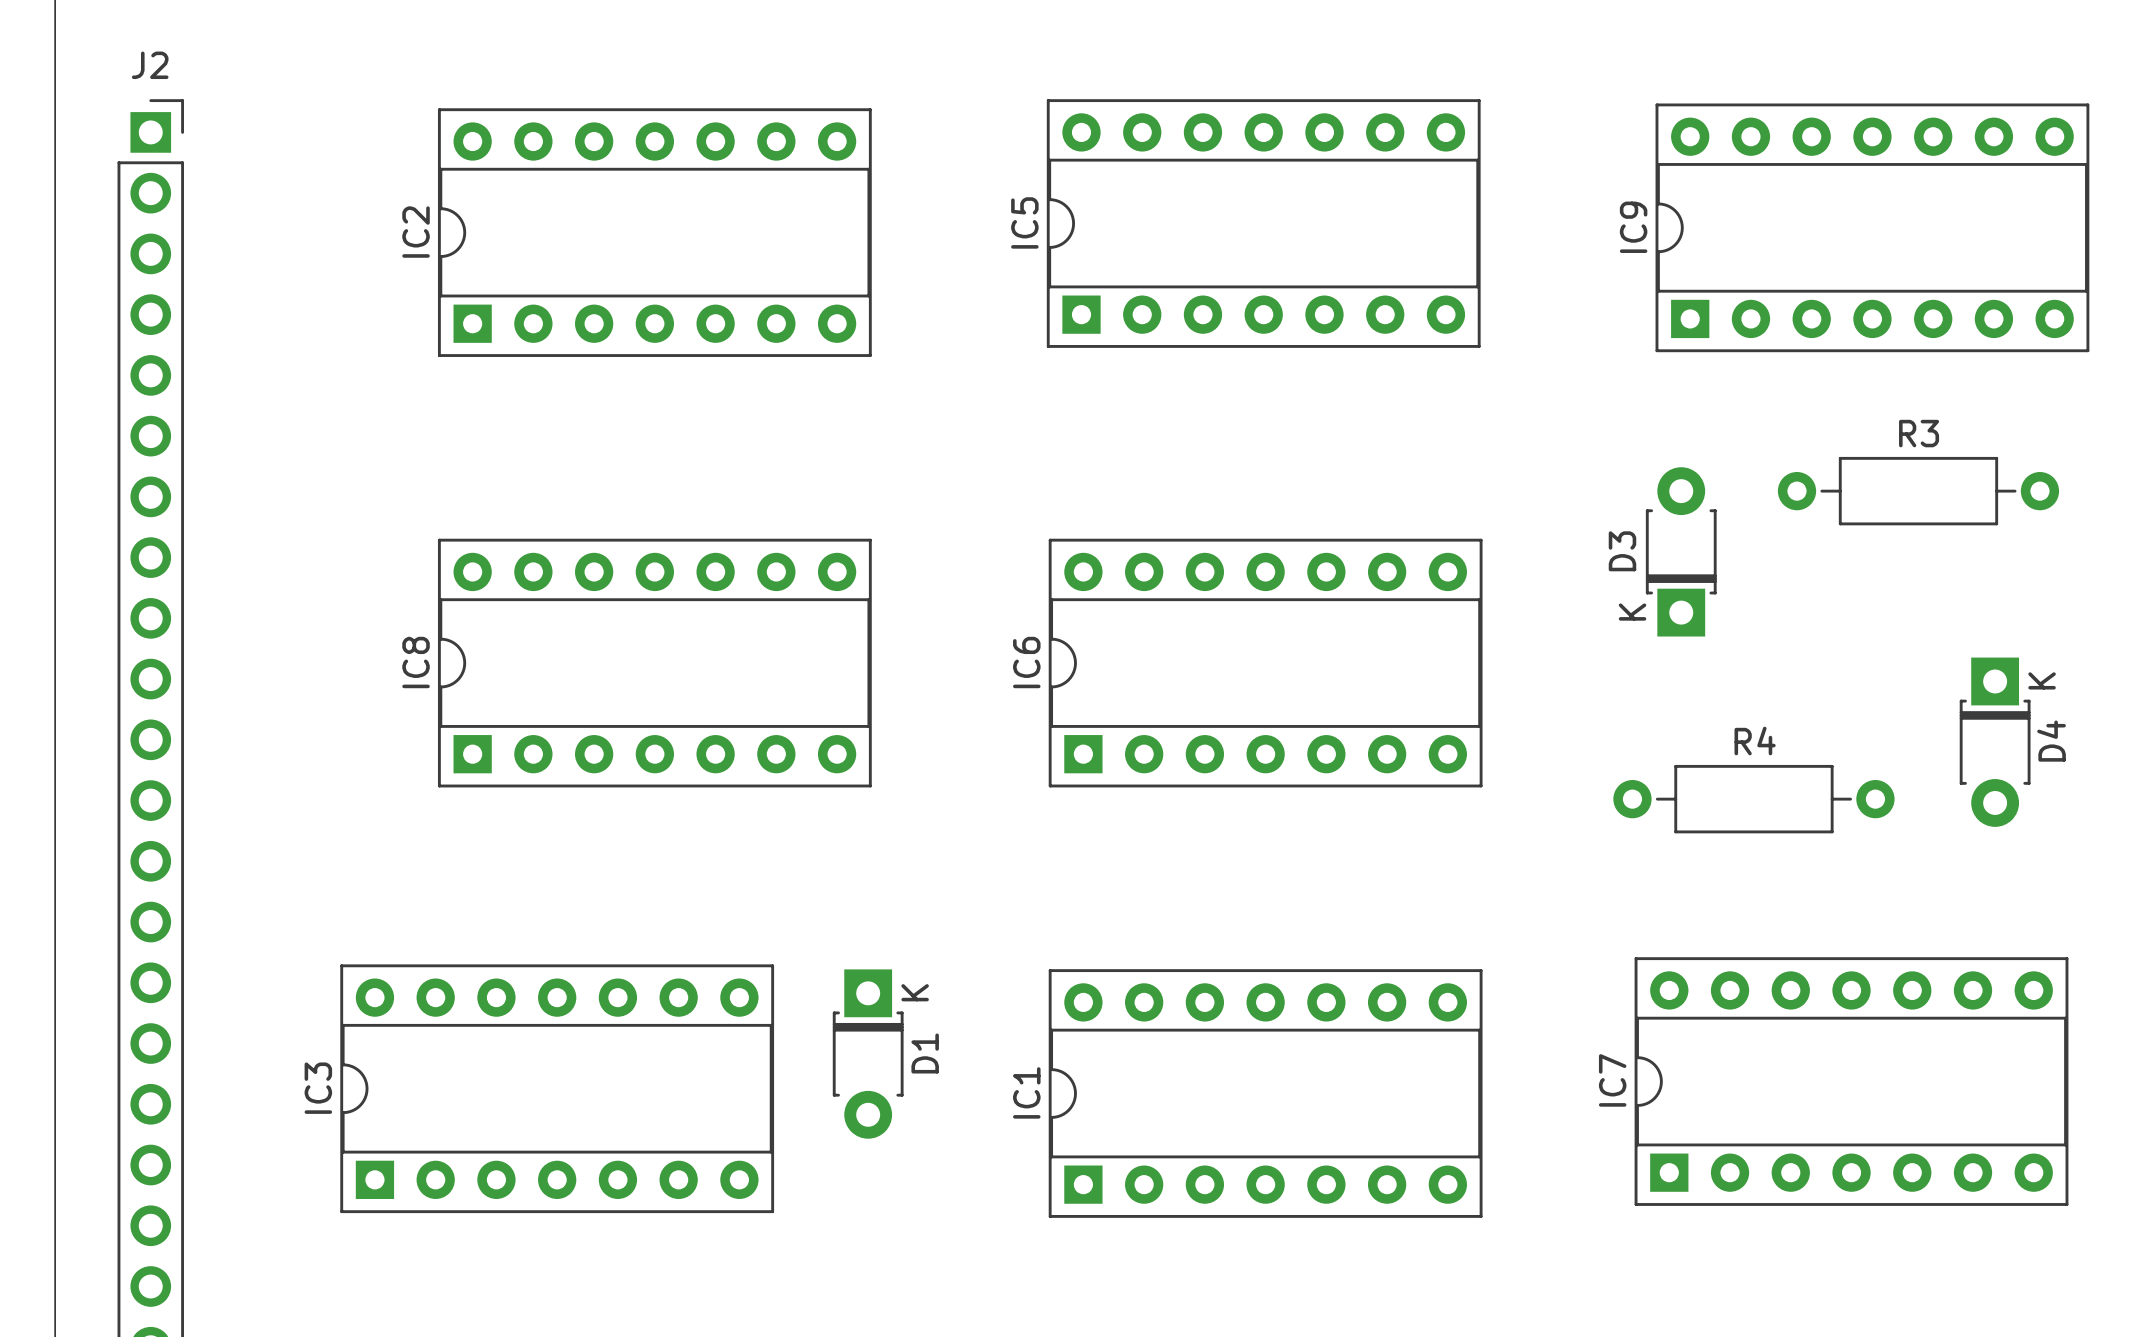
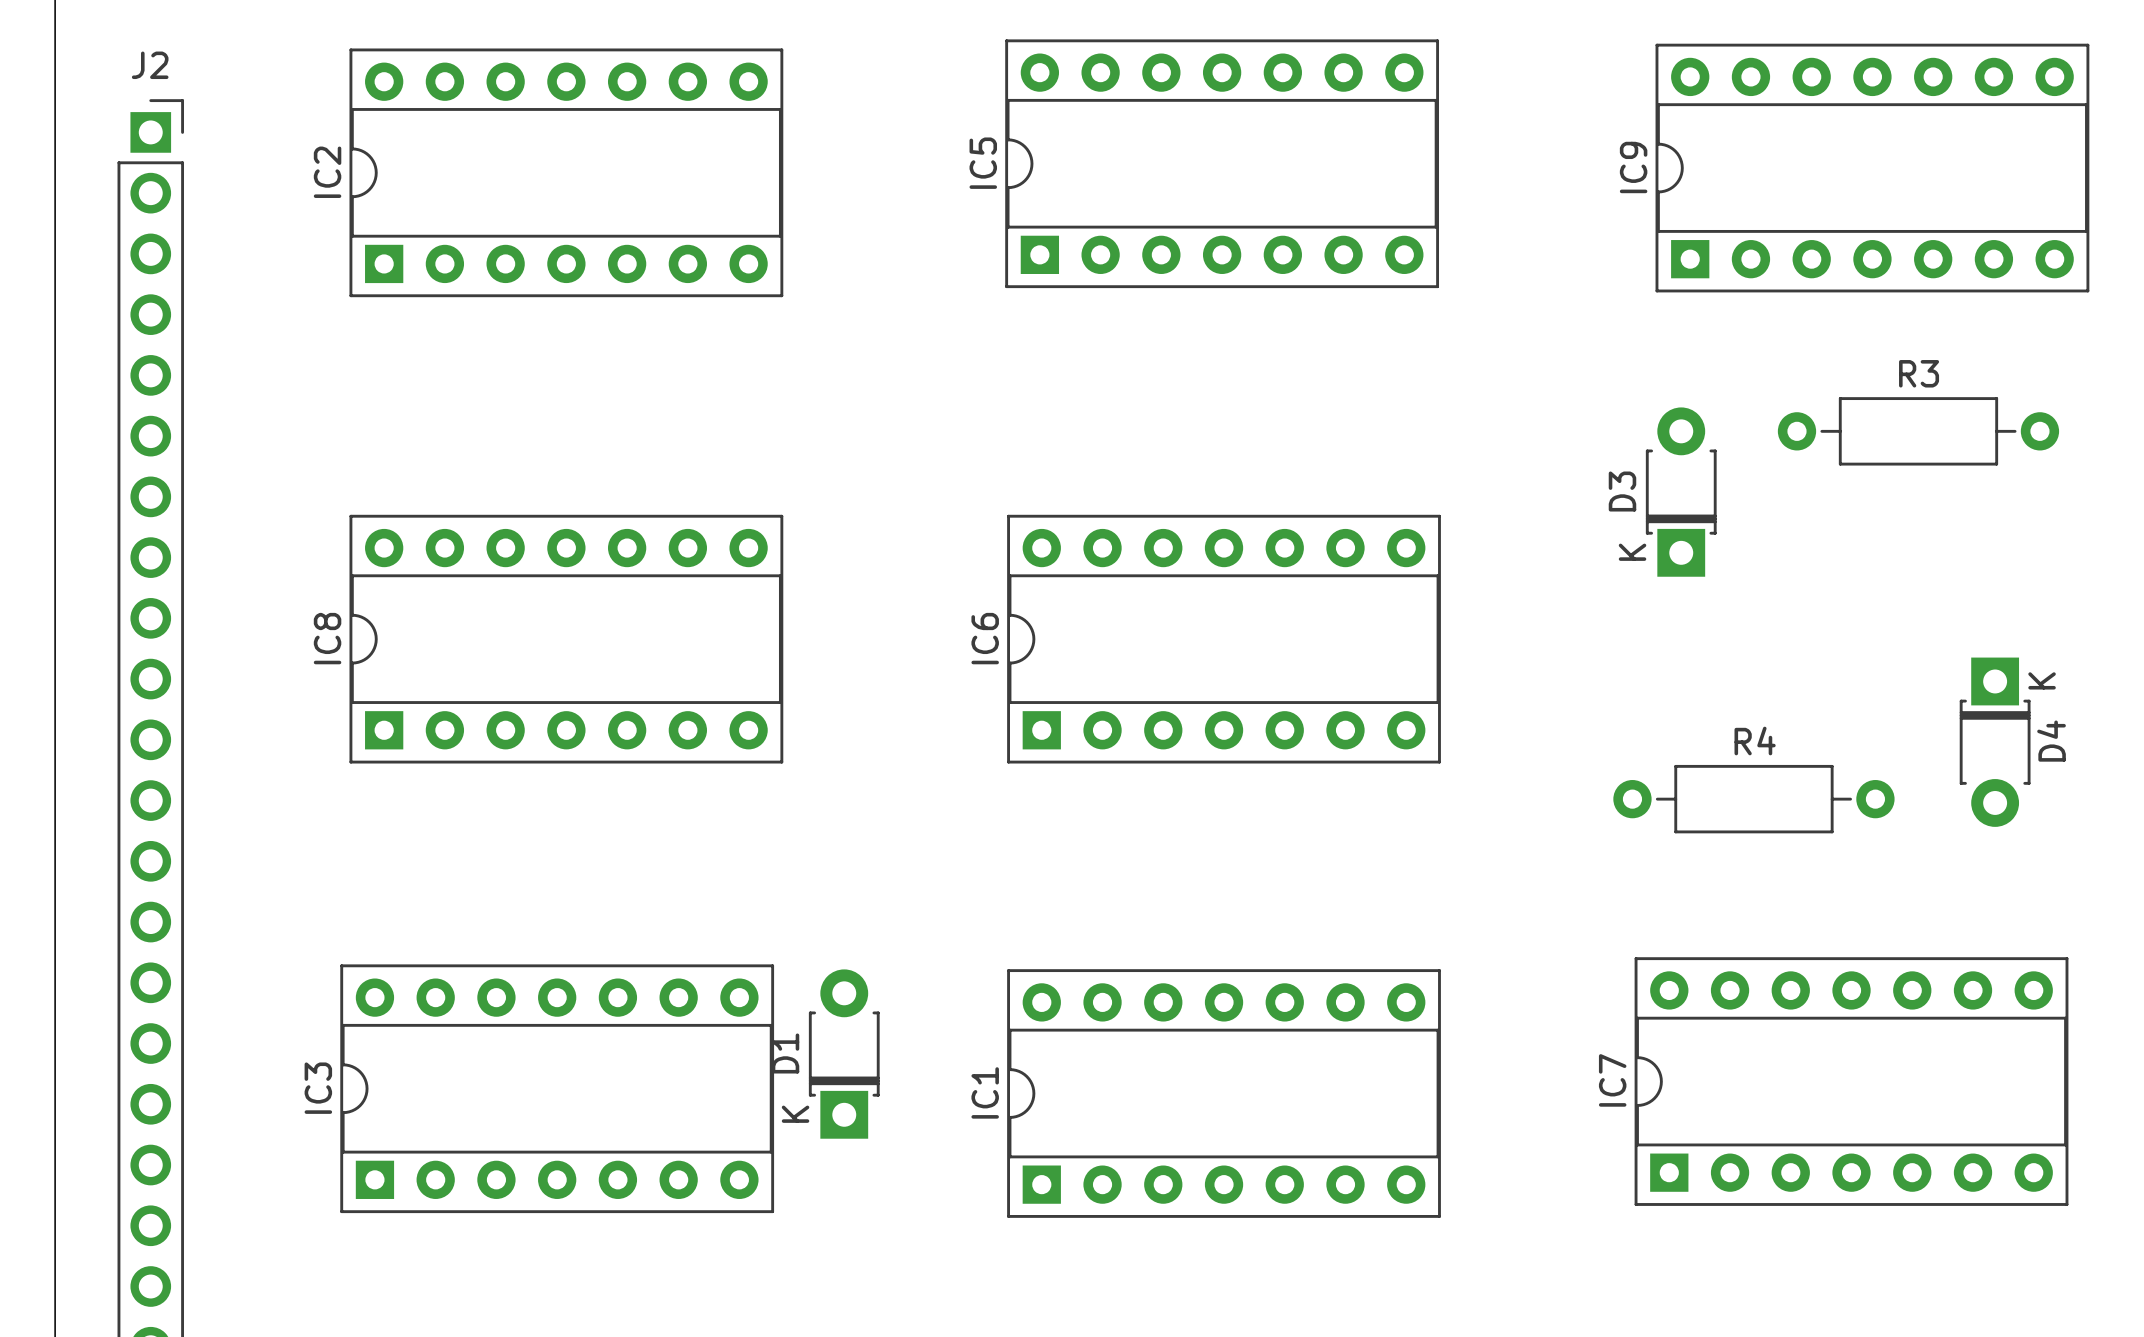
IC5 position: (1263, 223) -> (1222, 163)
IC9 position: (1872, 227) -> (1872, 168)
IC2 position: (654, 232) -> (566, 172)
R3 position: (1918, 491) -> (1918, 431)
D3 position: (1681, 551) -> (1681, 492)
IC8 position: (654, 663) -> (566, 639)
IC6 position: (1265, 663) -> (1224, 639)
D1 rotation: 0° (868, 1054) -> 180° (844, 1054)
IC1 position: (1265, 1093) -> (1224, 1093)

